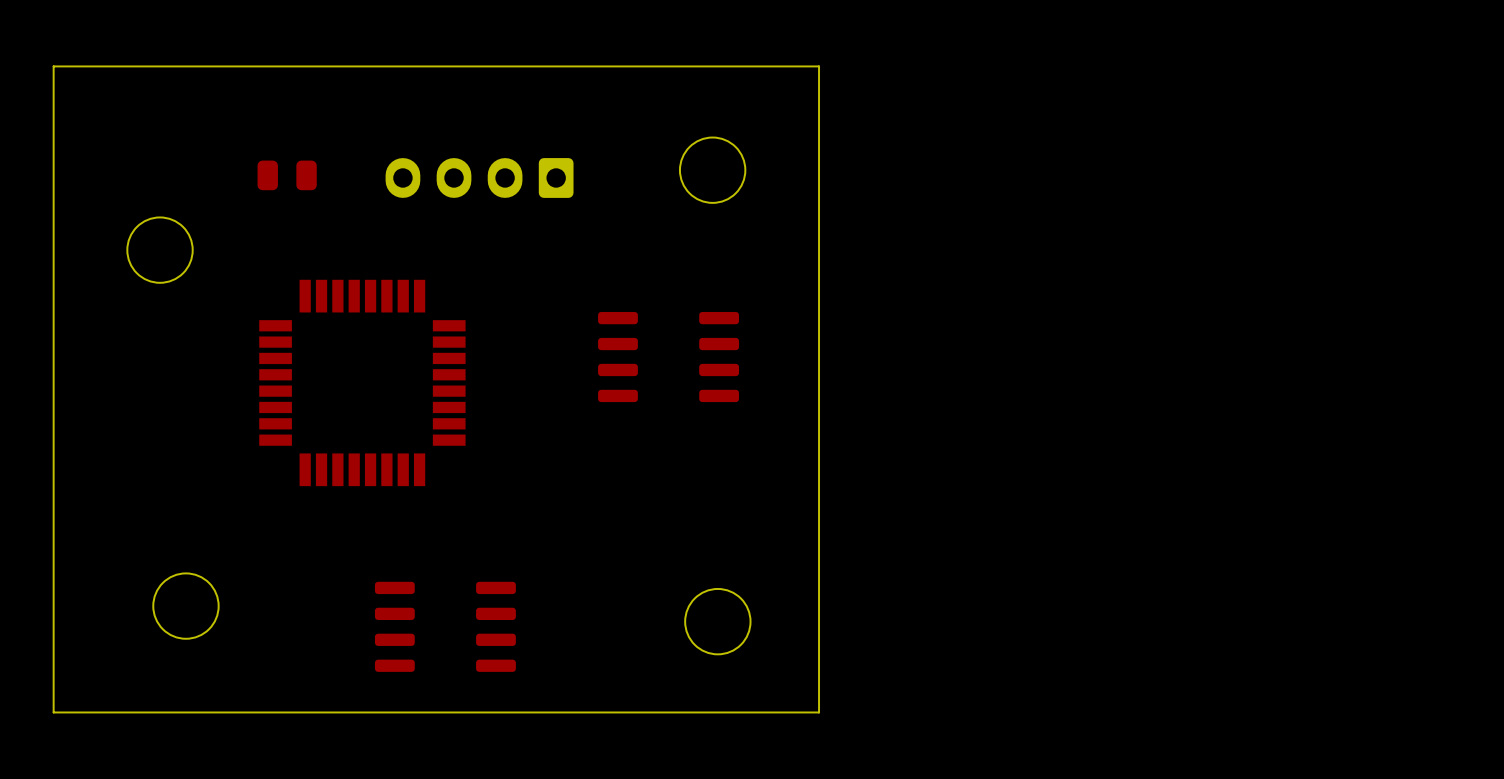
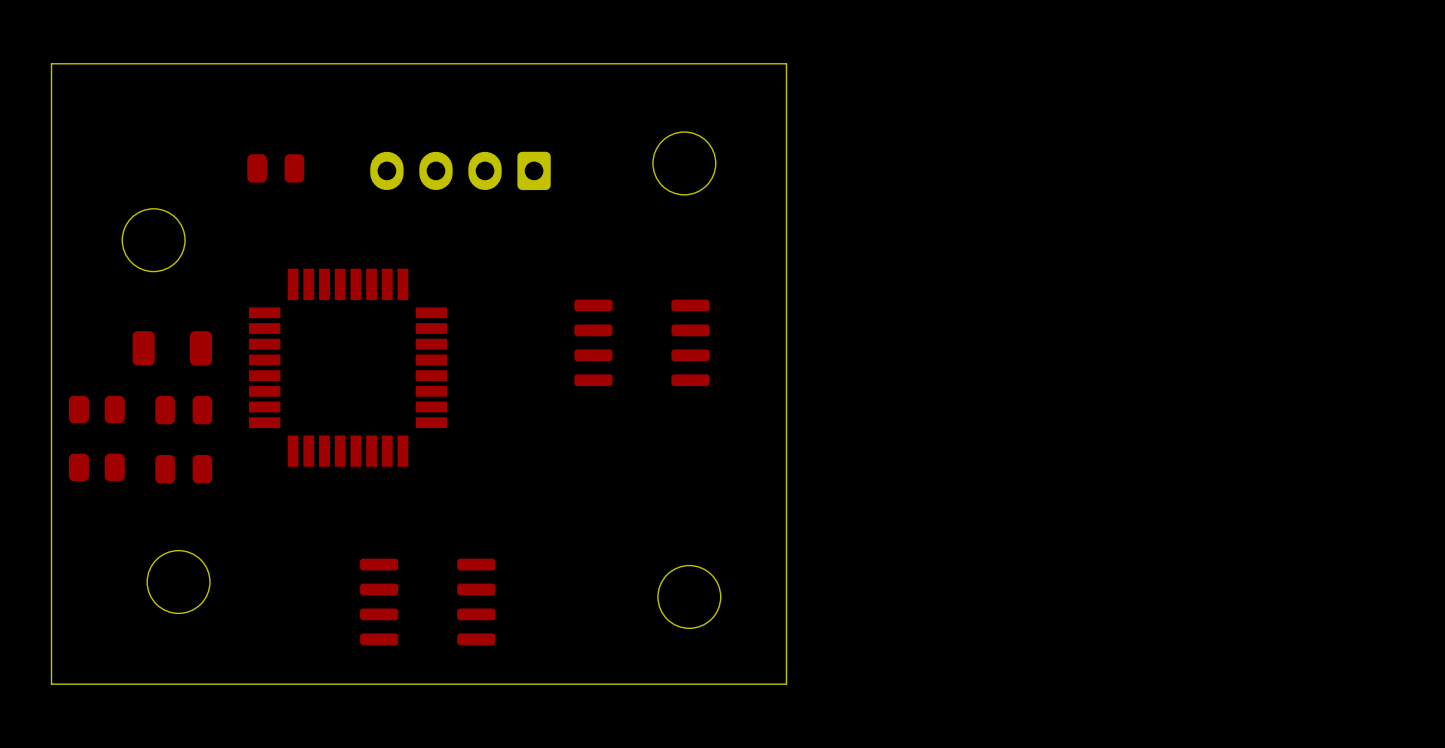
part: none -> (172, 348)
part: none -> (96, 409)
part: none -> (183, 410)
part: none -> (96, 467)
part: none -> (183, 469)

